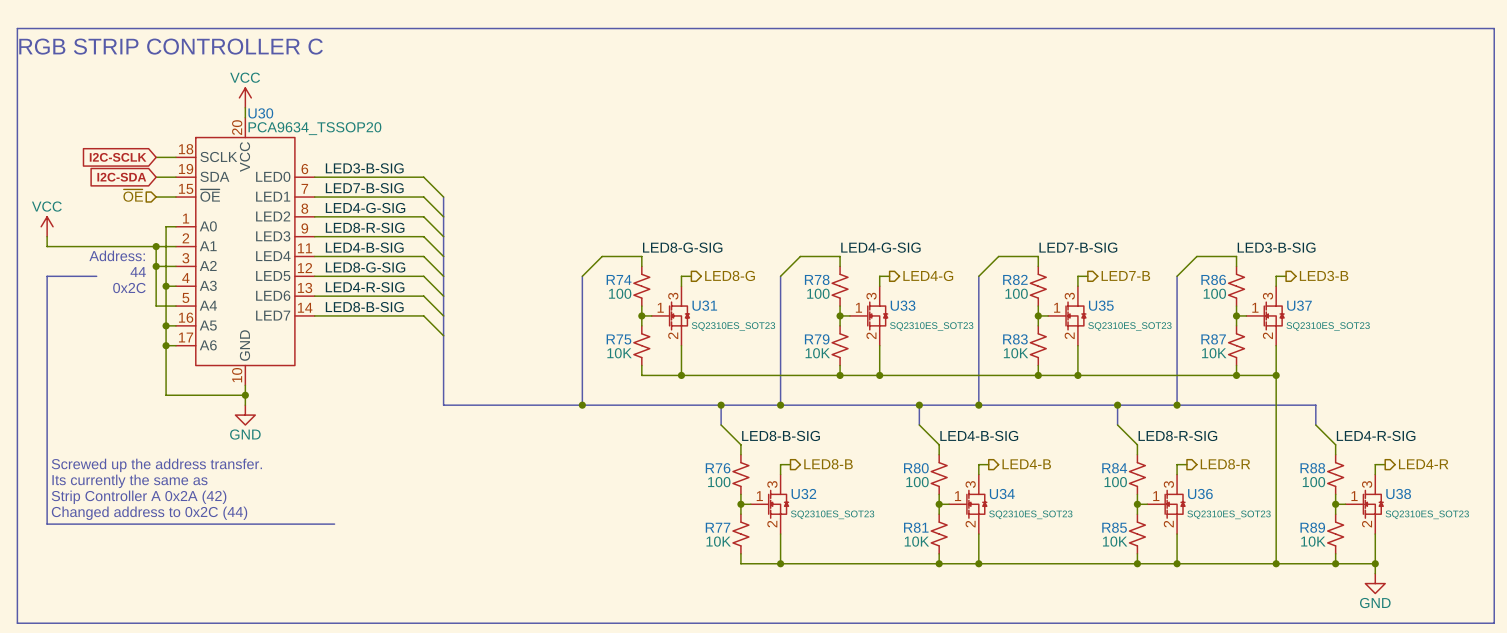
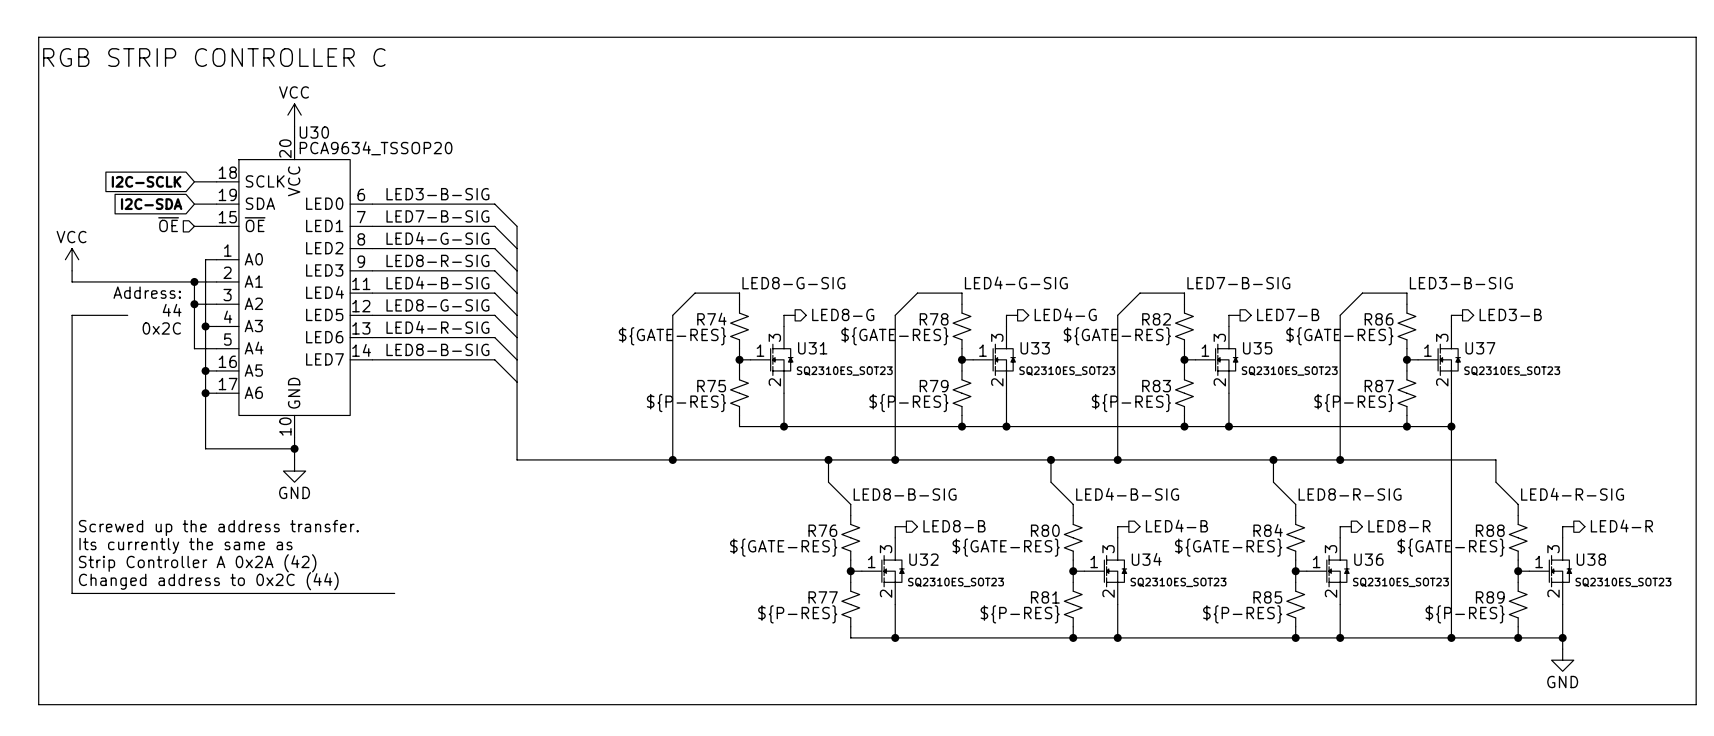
R74 value: 100 (620, 293) -> ${GATE-RES} (672, 336)
R78 value: 100 (818, 293) -> ${GATE-RES} (894, 336)
R82 value: 100 (1016, 293) -> ${GATE-RES} (1117, 336)
R86 value: 100 (1214, 293) -> ${GATE-RES} (1339, 336)
R75 value: 10K (619, 353) -> ${P-RES} (686, 403)
R79 value: 10K (817, 353) -> ${P-RES} (908, 403)
R83 value: 10K (1016, 353) -> ${P-RES} (1131, 403)
R87 value: 10K (1214, 353) -> ${P-RES} (1353, 403)
R76 value: 100 (719, 482) -> ${GATE-RES} (783, 547)
R80 value: 100 (917, 482) -> ${GATE-RES} (1006, 547)
R84 value: 100 (1115, 482) -> ${GATE-RES} (1228, 547)
R88 value: 100 (1313, 482) -> ${GATE-RES} (1451, 547)
R77 value: 10K (718, 541) -> ${P-RES} (797, 614)
R81 value: 10K (916, 541) -> ${P-RES} (1020, 614)
R85 value: 10K (1115, 541) -> ${P-RES} (1242, 614)
R89 value: 10K (1313, 541) -> ${P-RES} (1465, 614)

